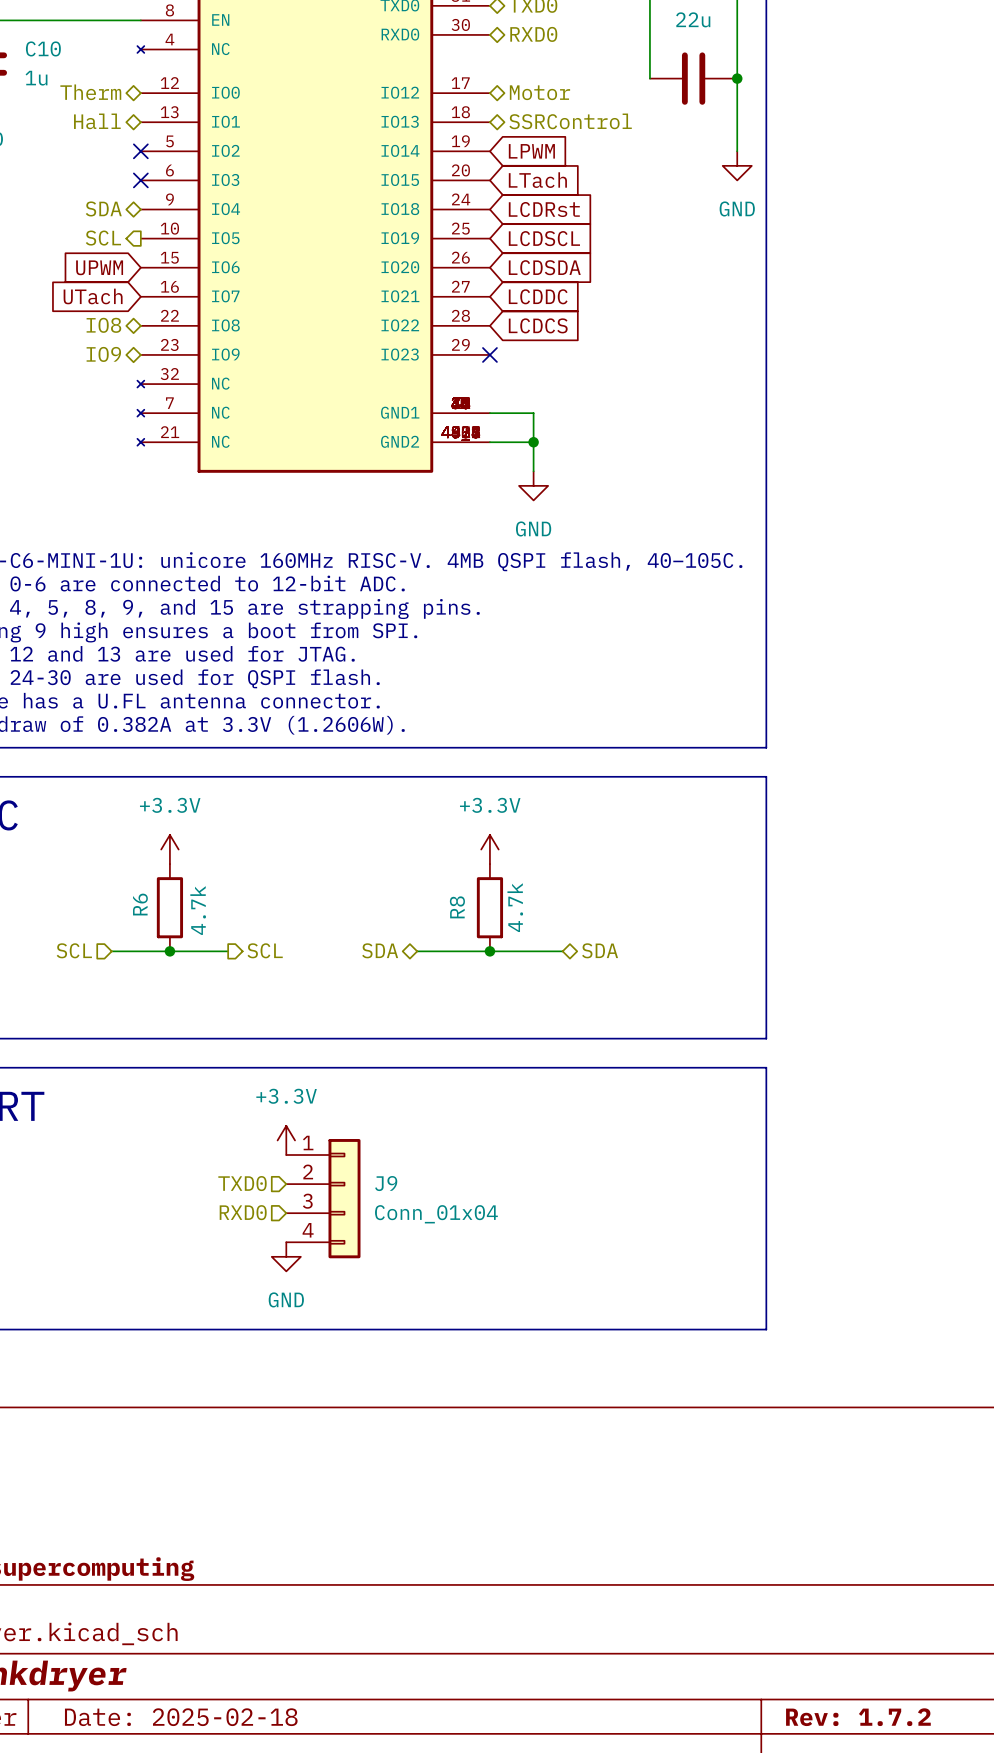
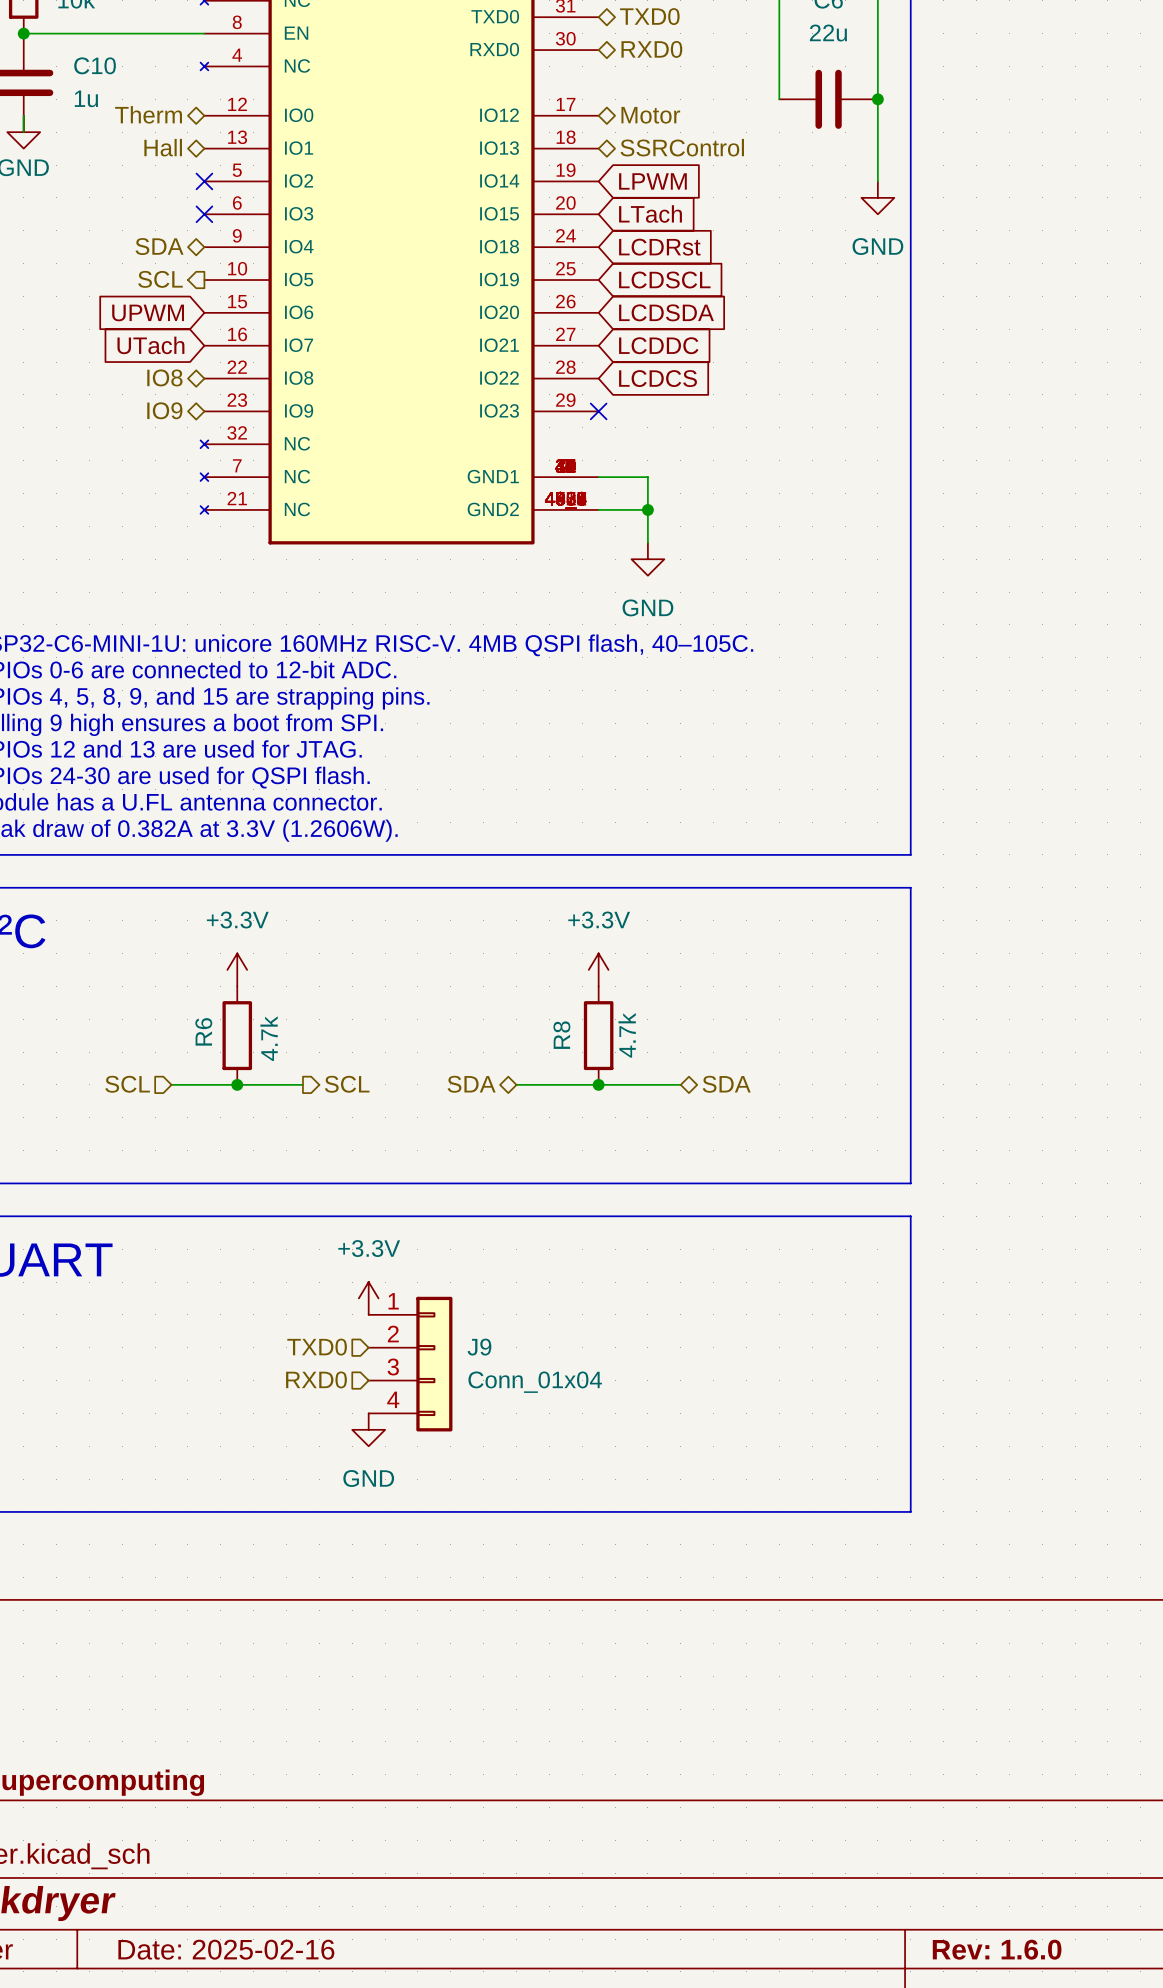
title block: Date: 2025-02-18 (181, 1717) -> Date: 2025-02-16 (226, 1949)
title block: Rev: 1.7.2 (858, 1717) -> Rev: 1.6.0 (997, 1949)

